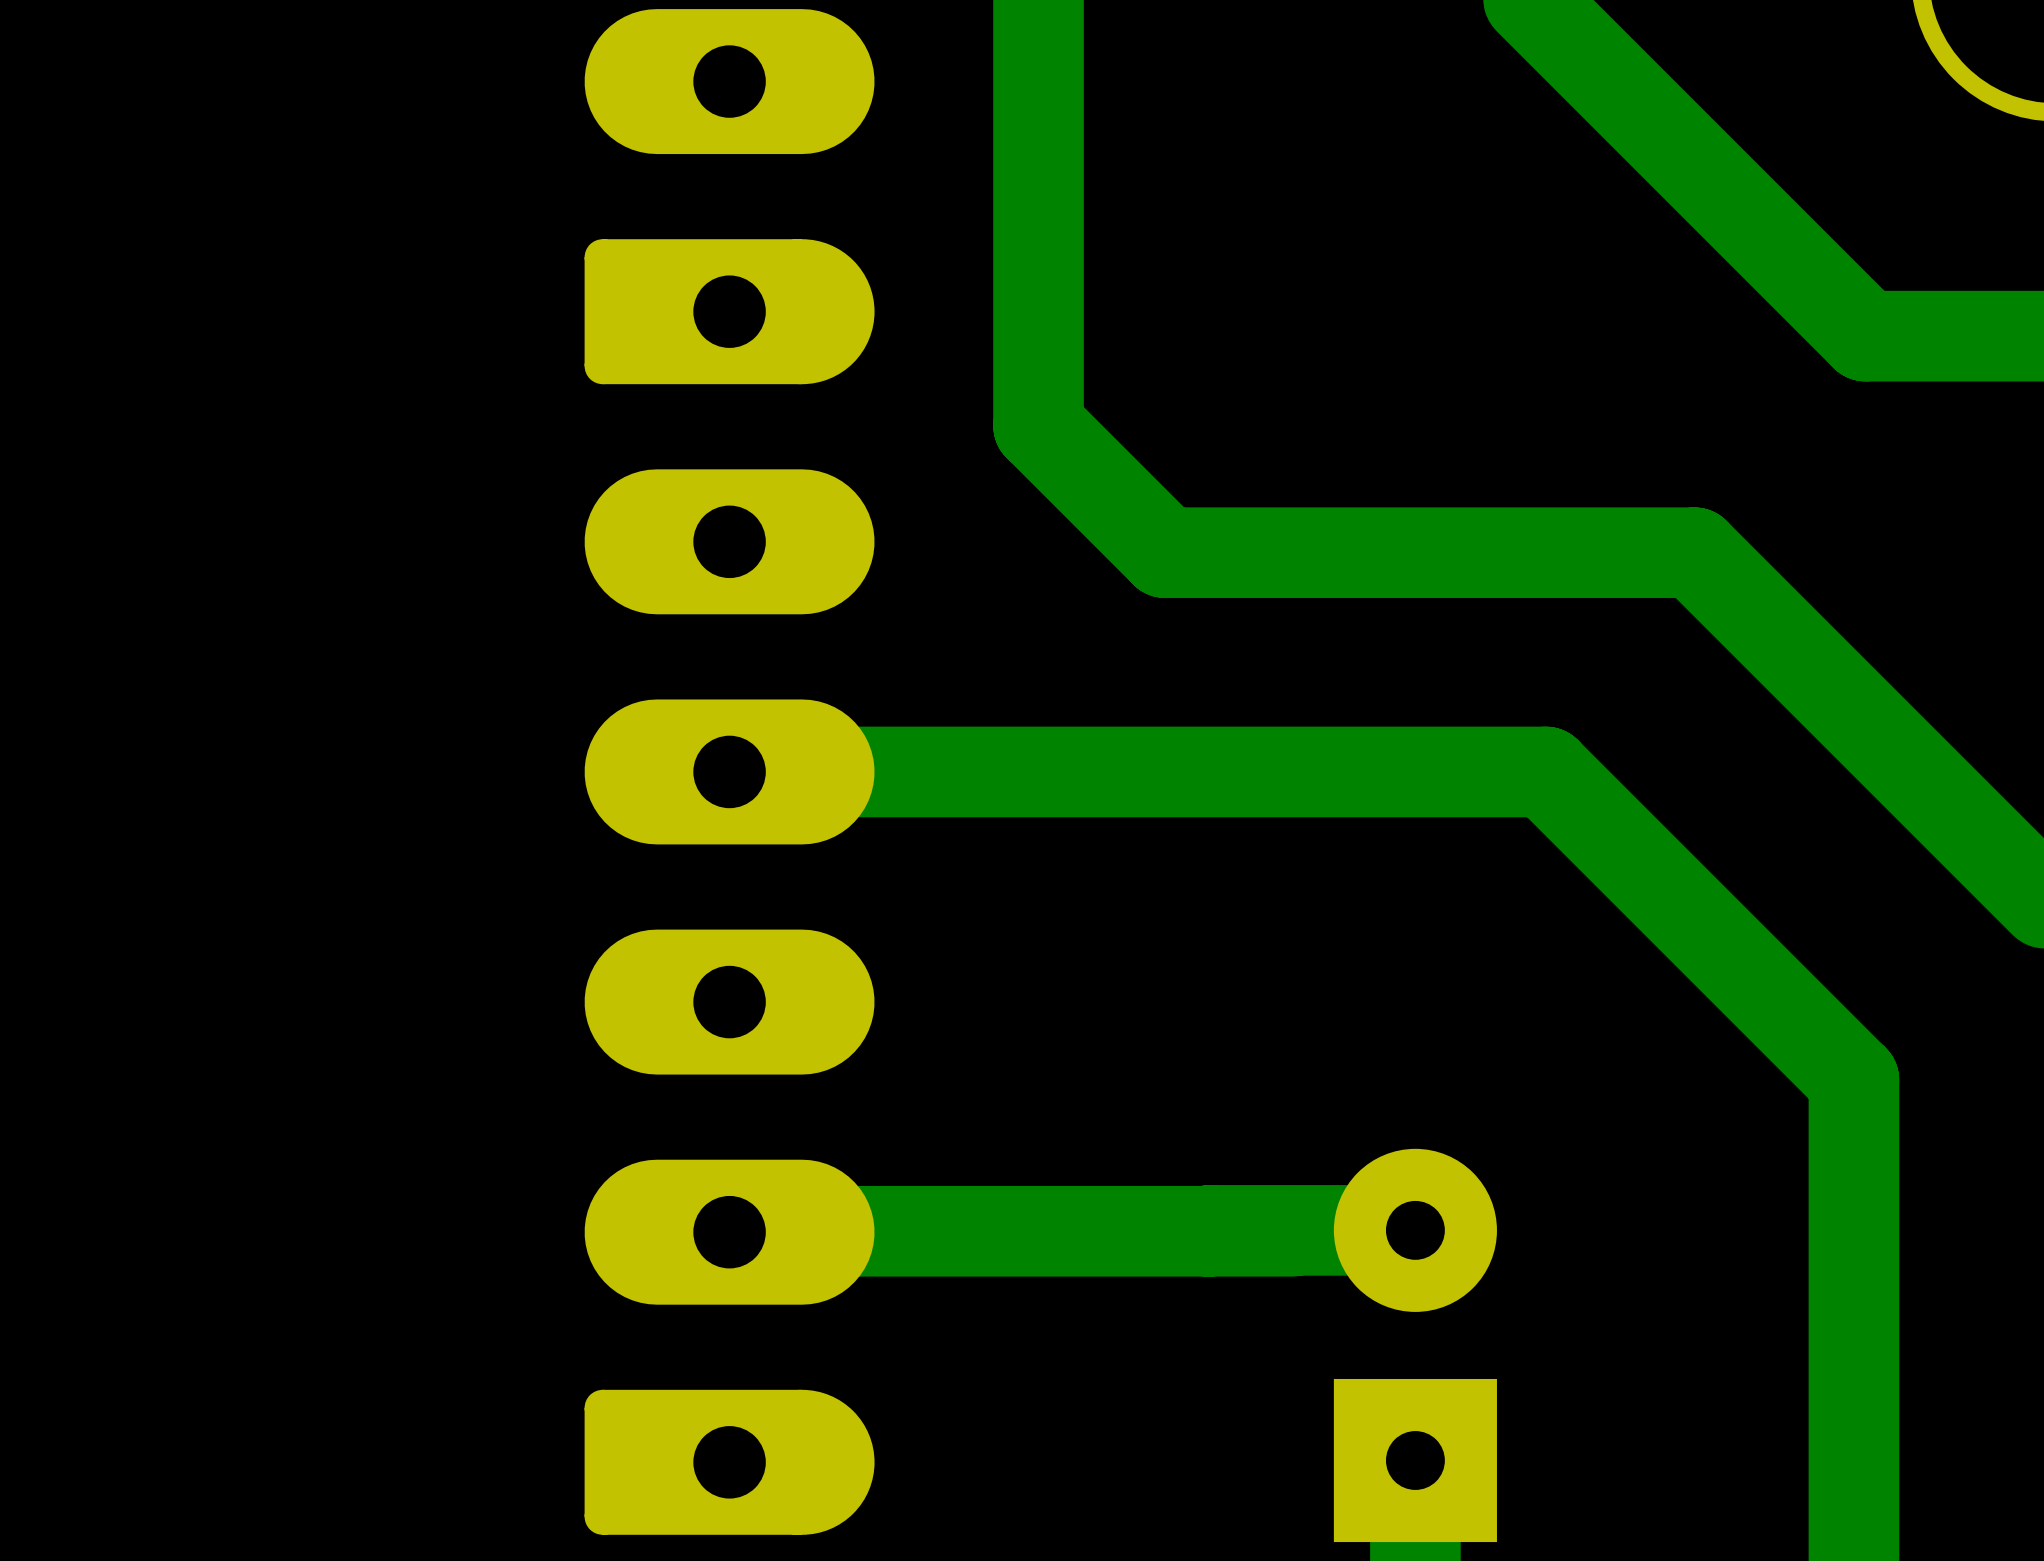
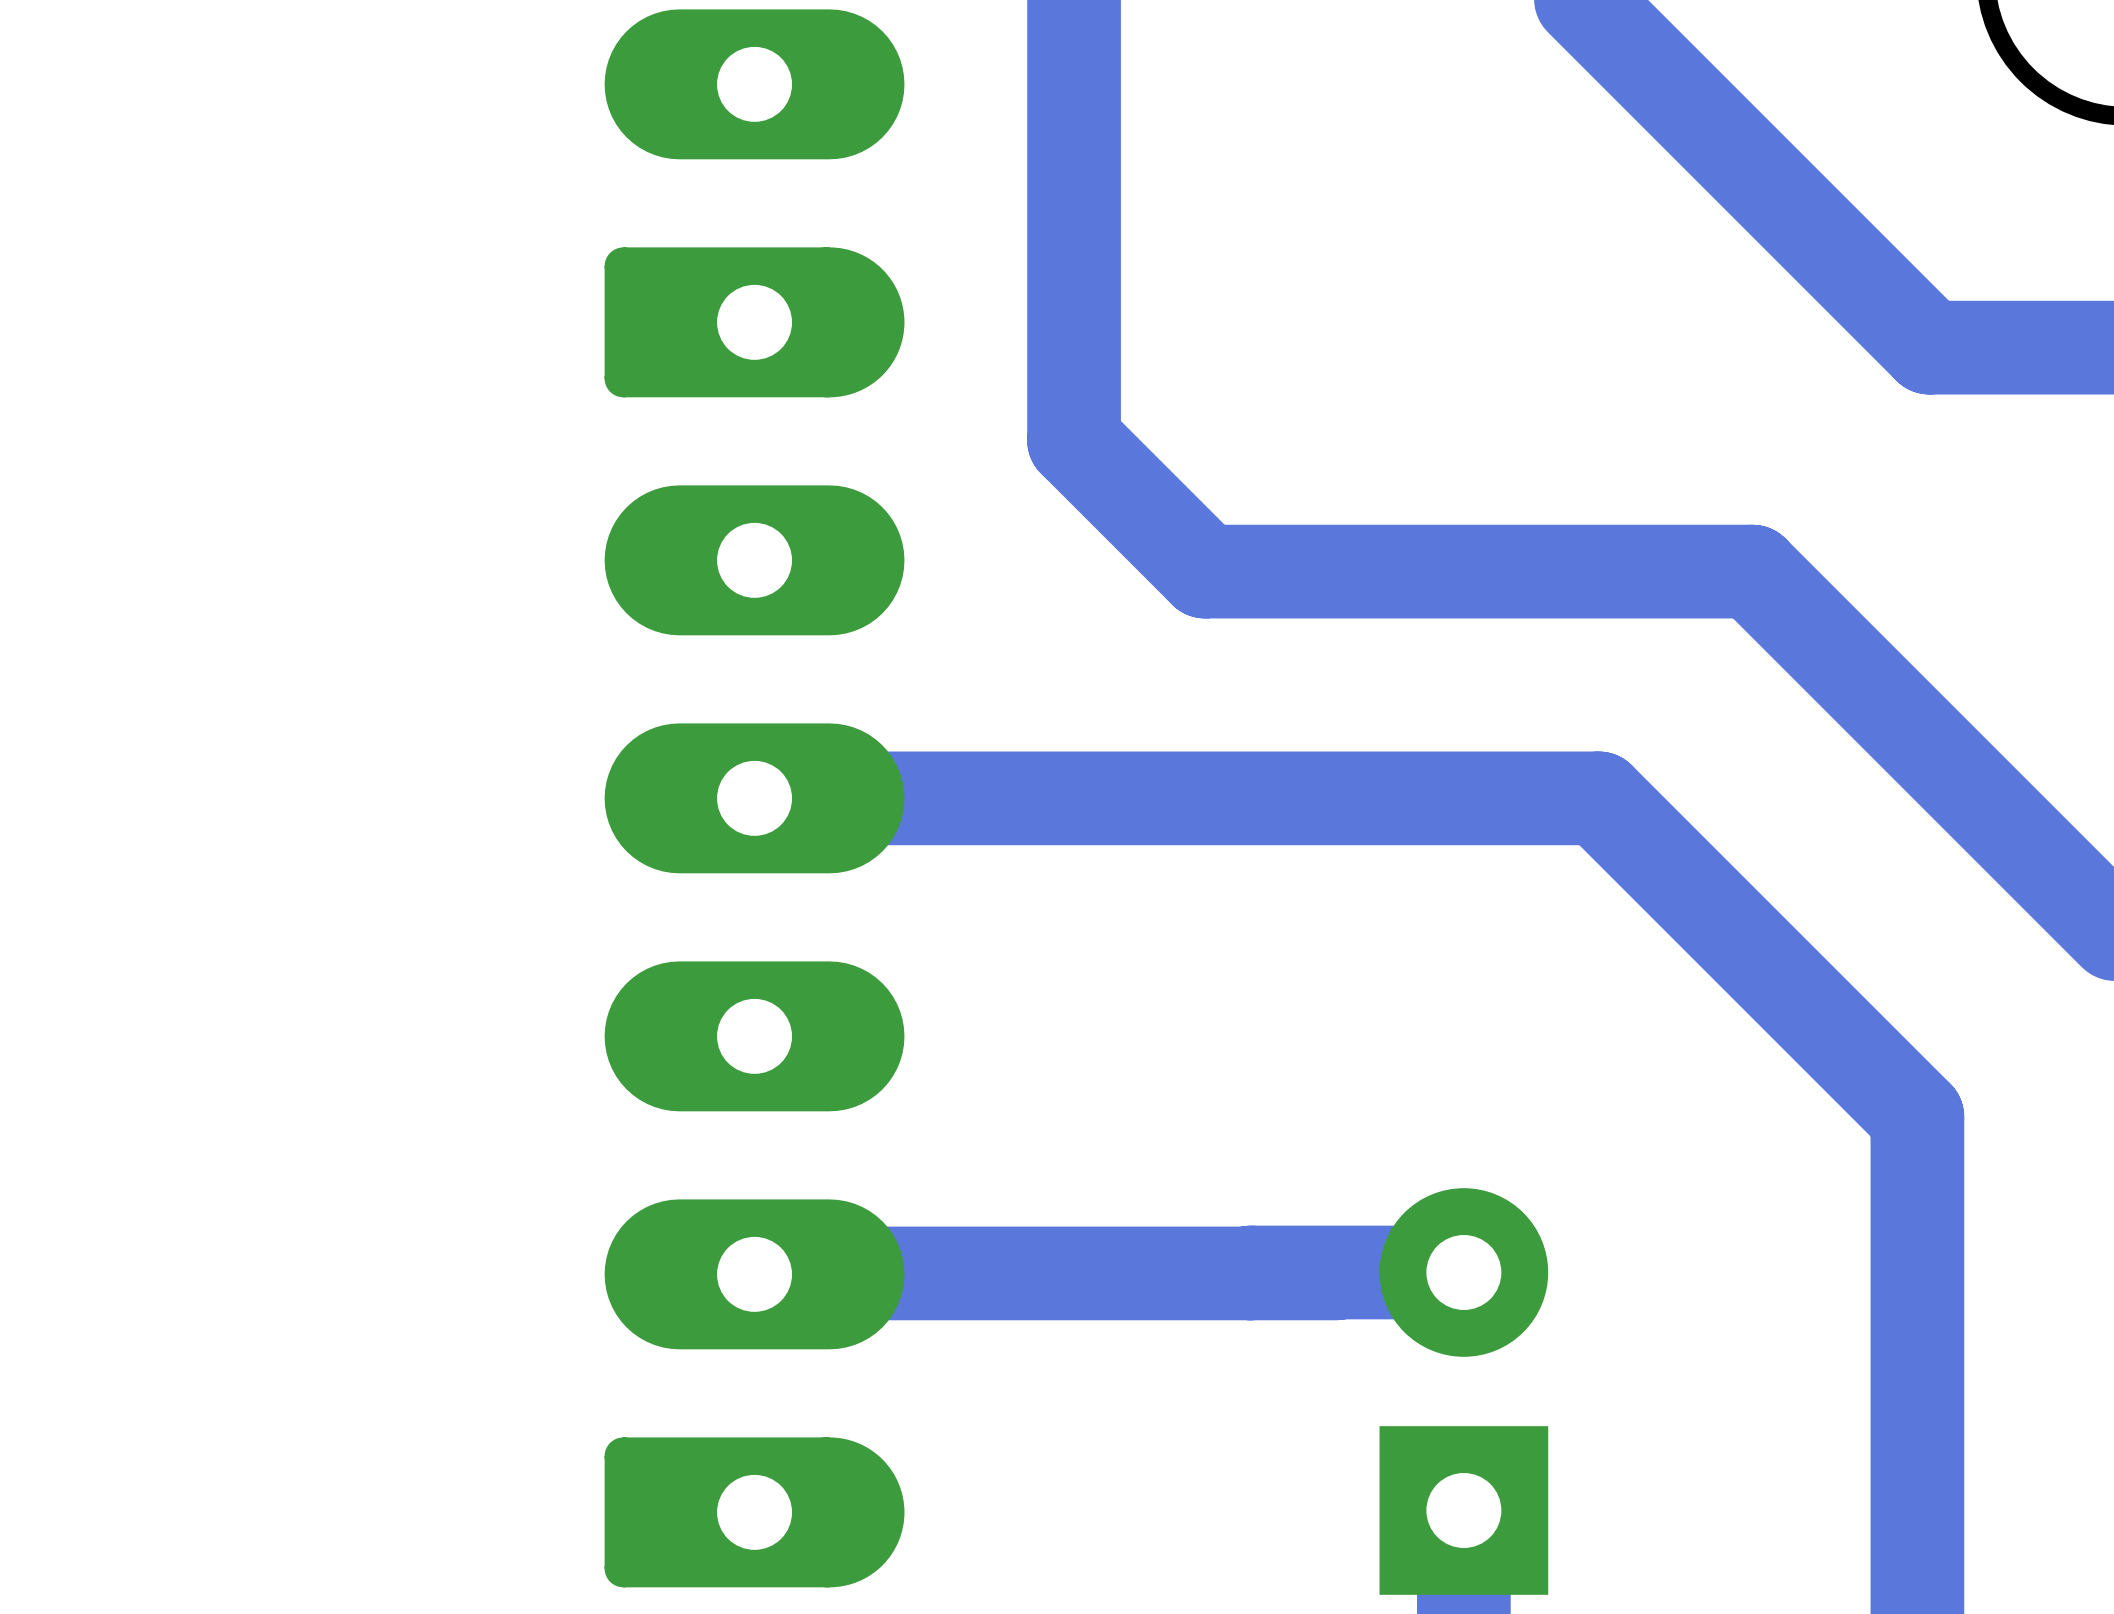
part footprint: [1333, 1148, 1497, 1543] -> [1379, 1188, 1549, 1595]

